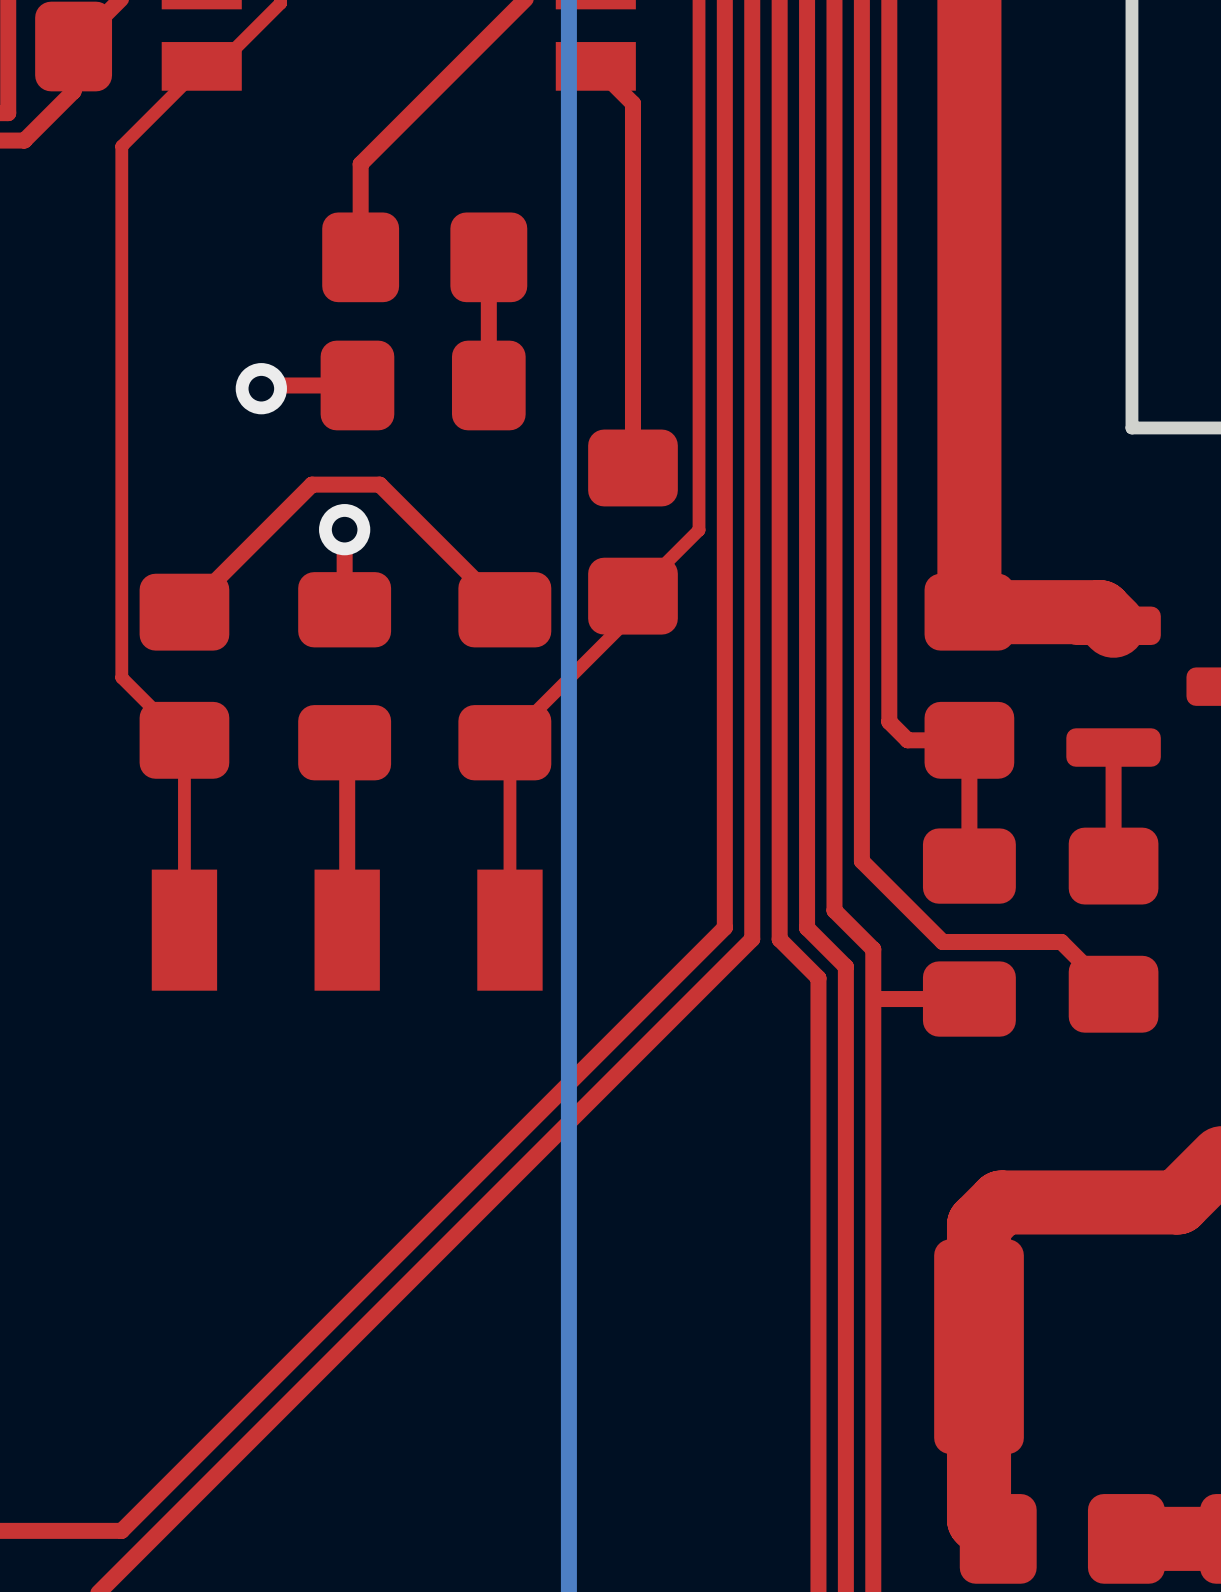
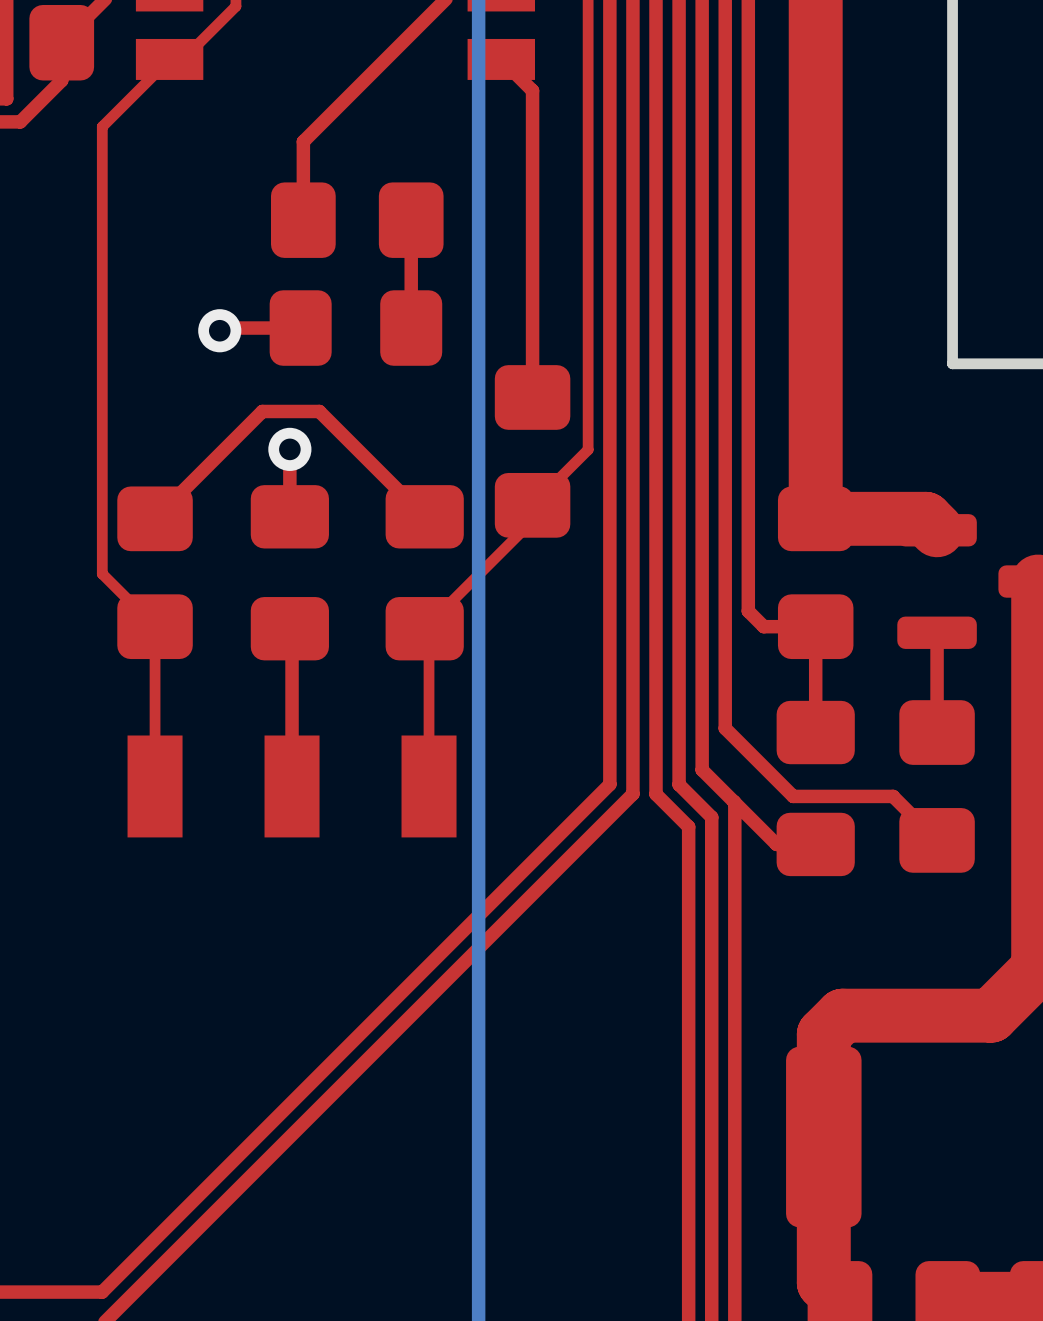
top track: (922, 999) (874, 999) -> (776, 844) (734, 802)

